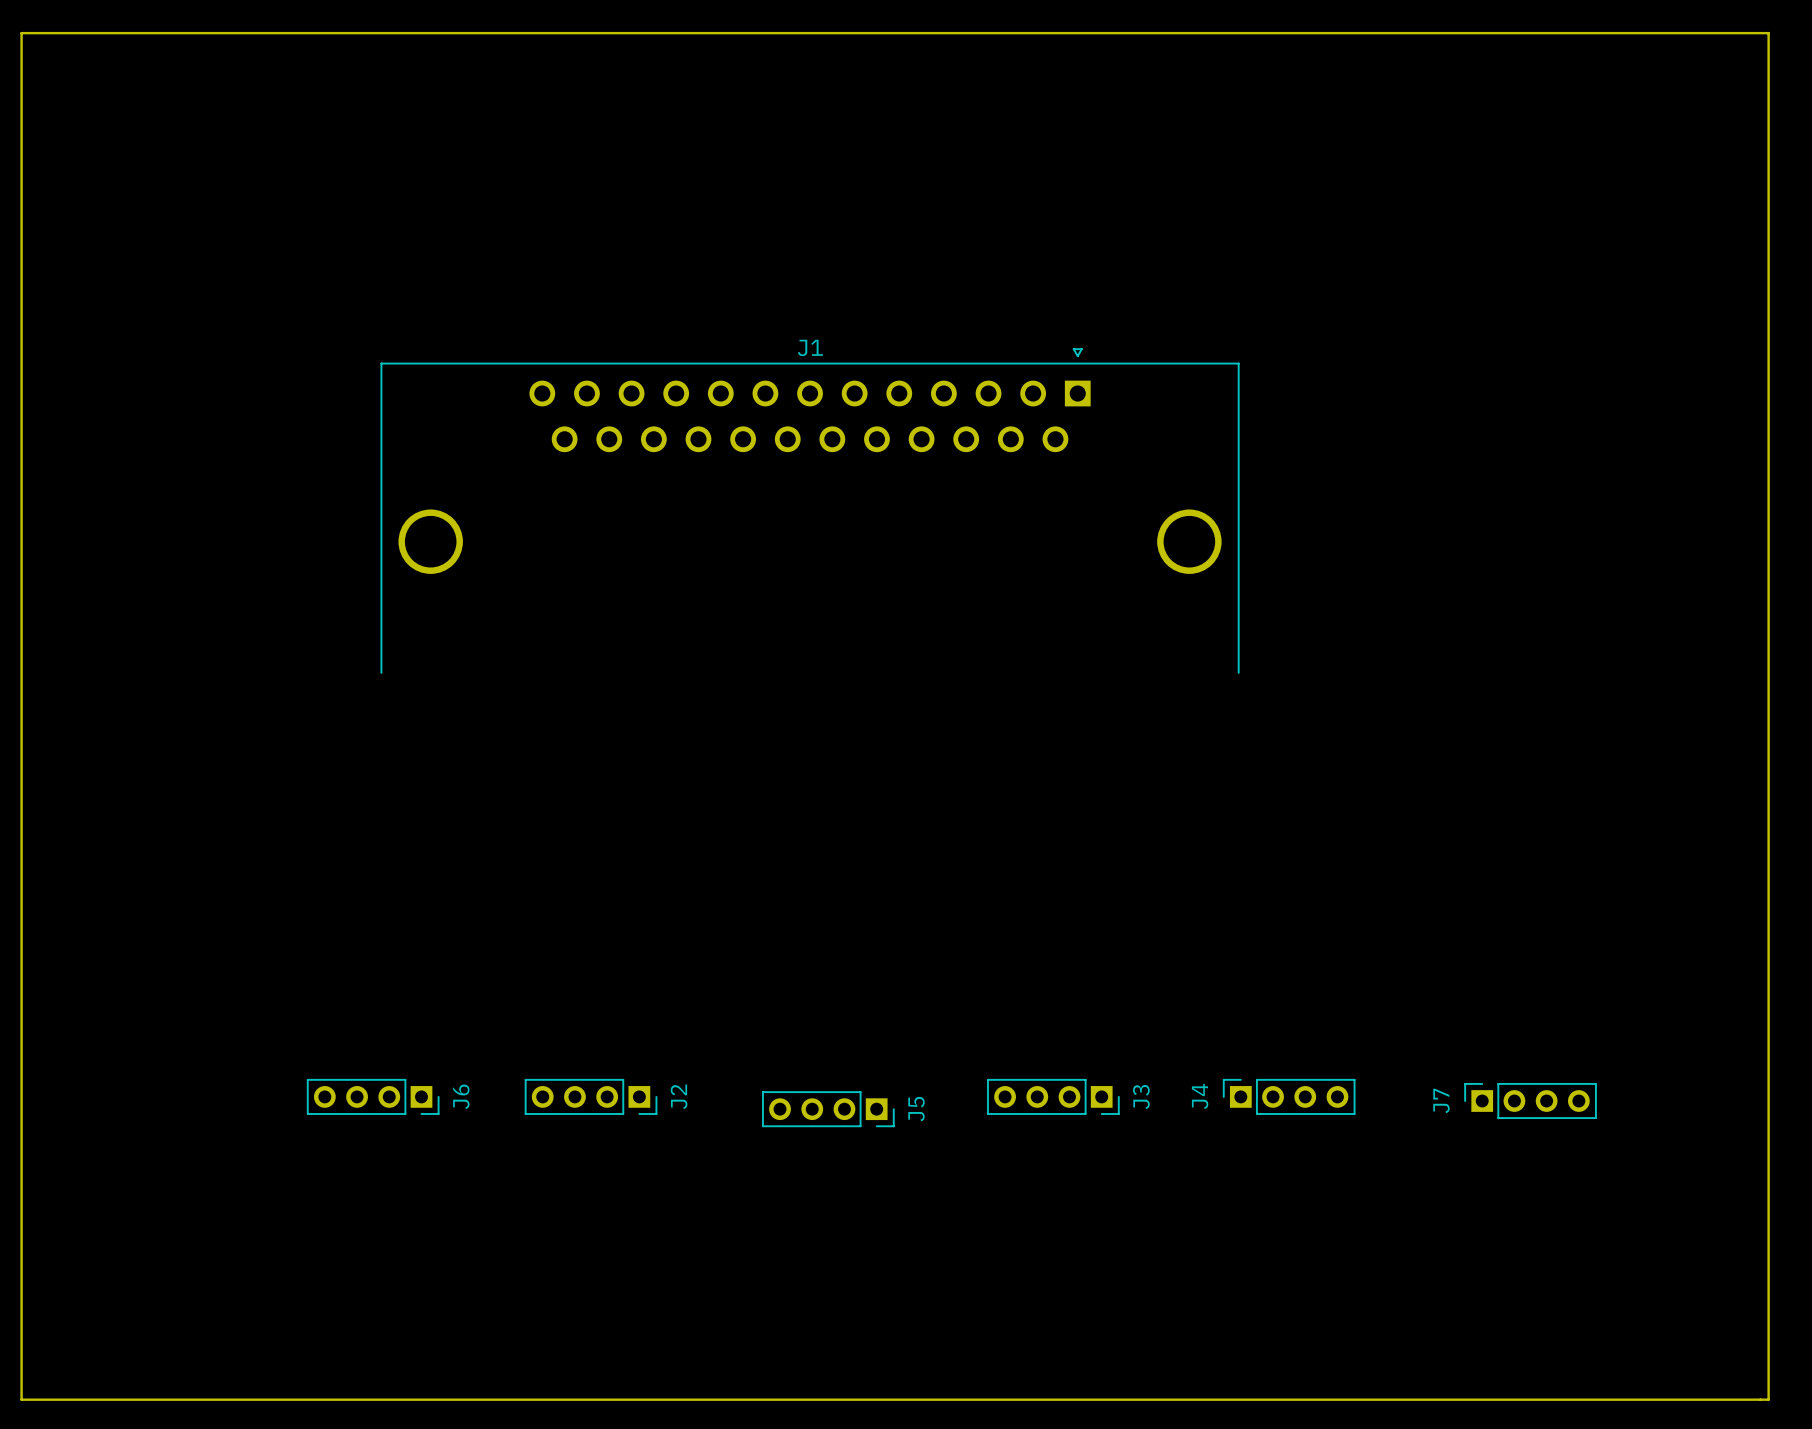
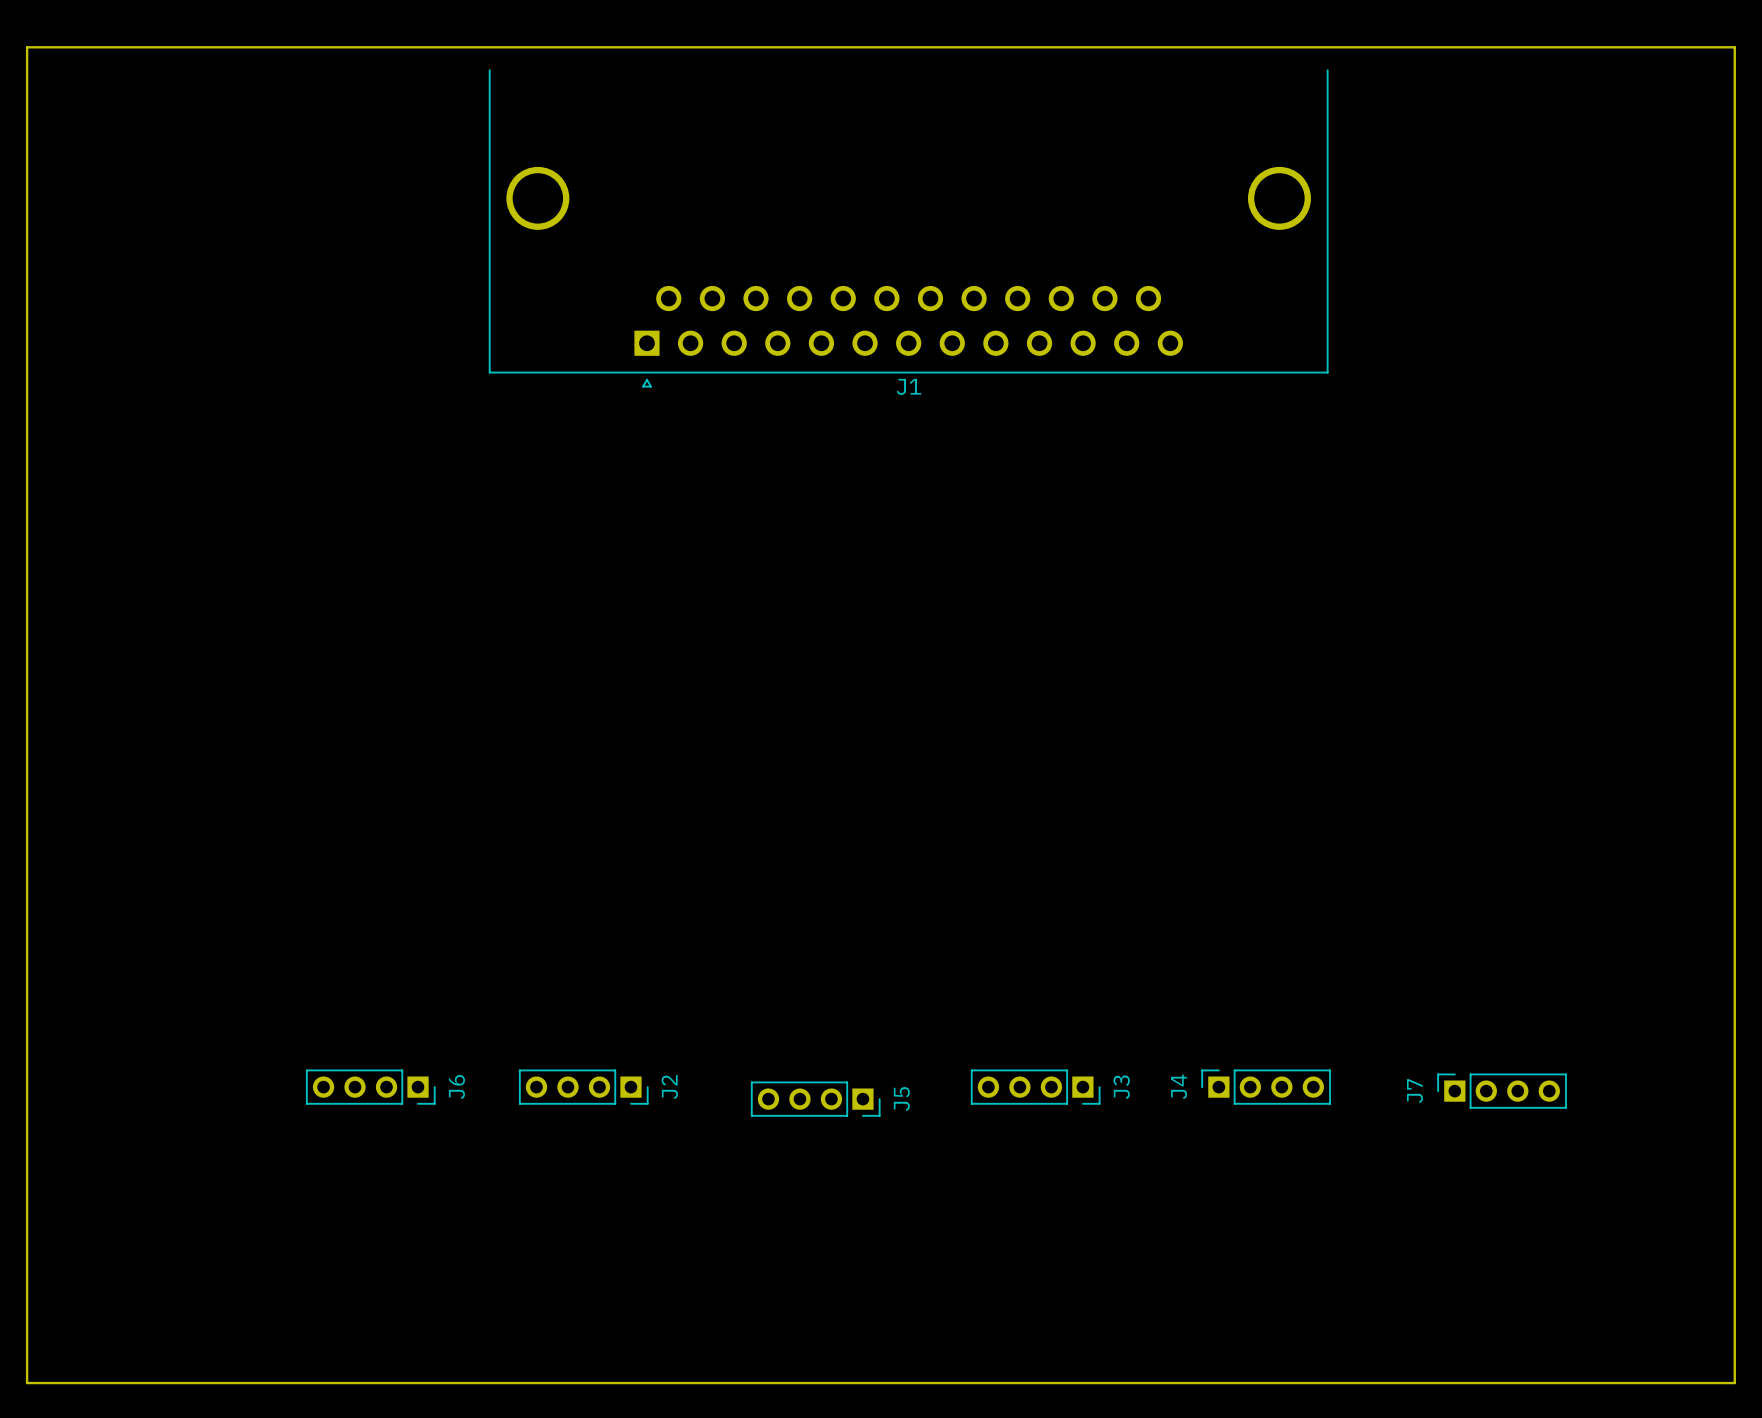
J1 rotation: 0° (810, 510) -> 180° (908, 228)

